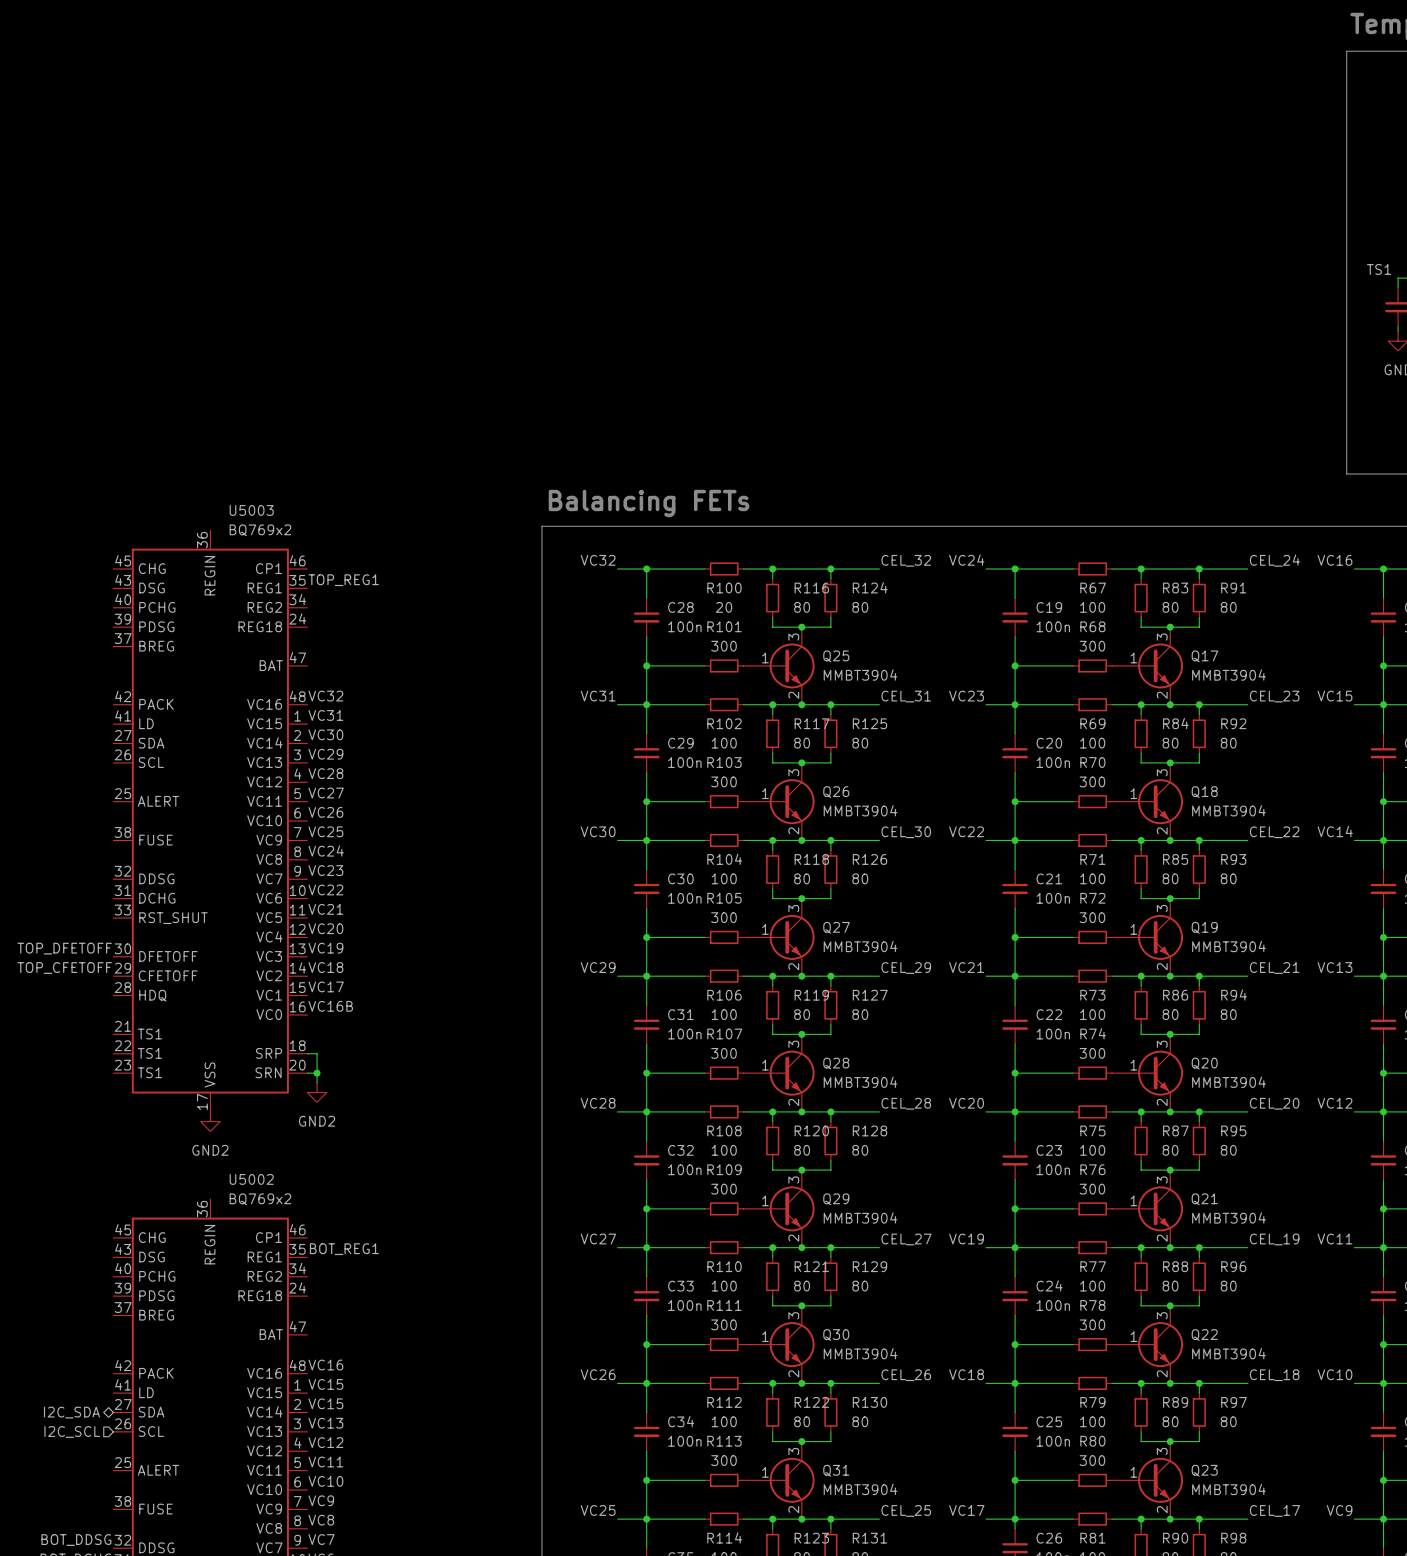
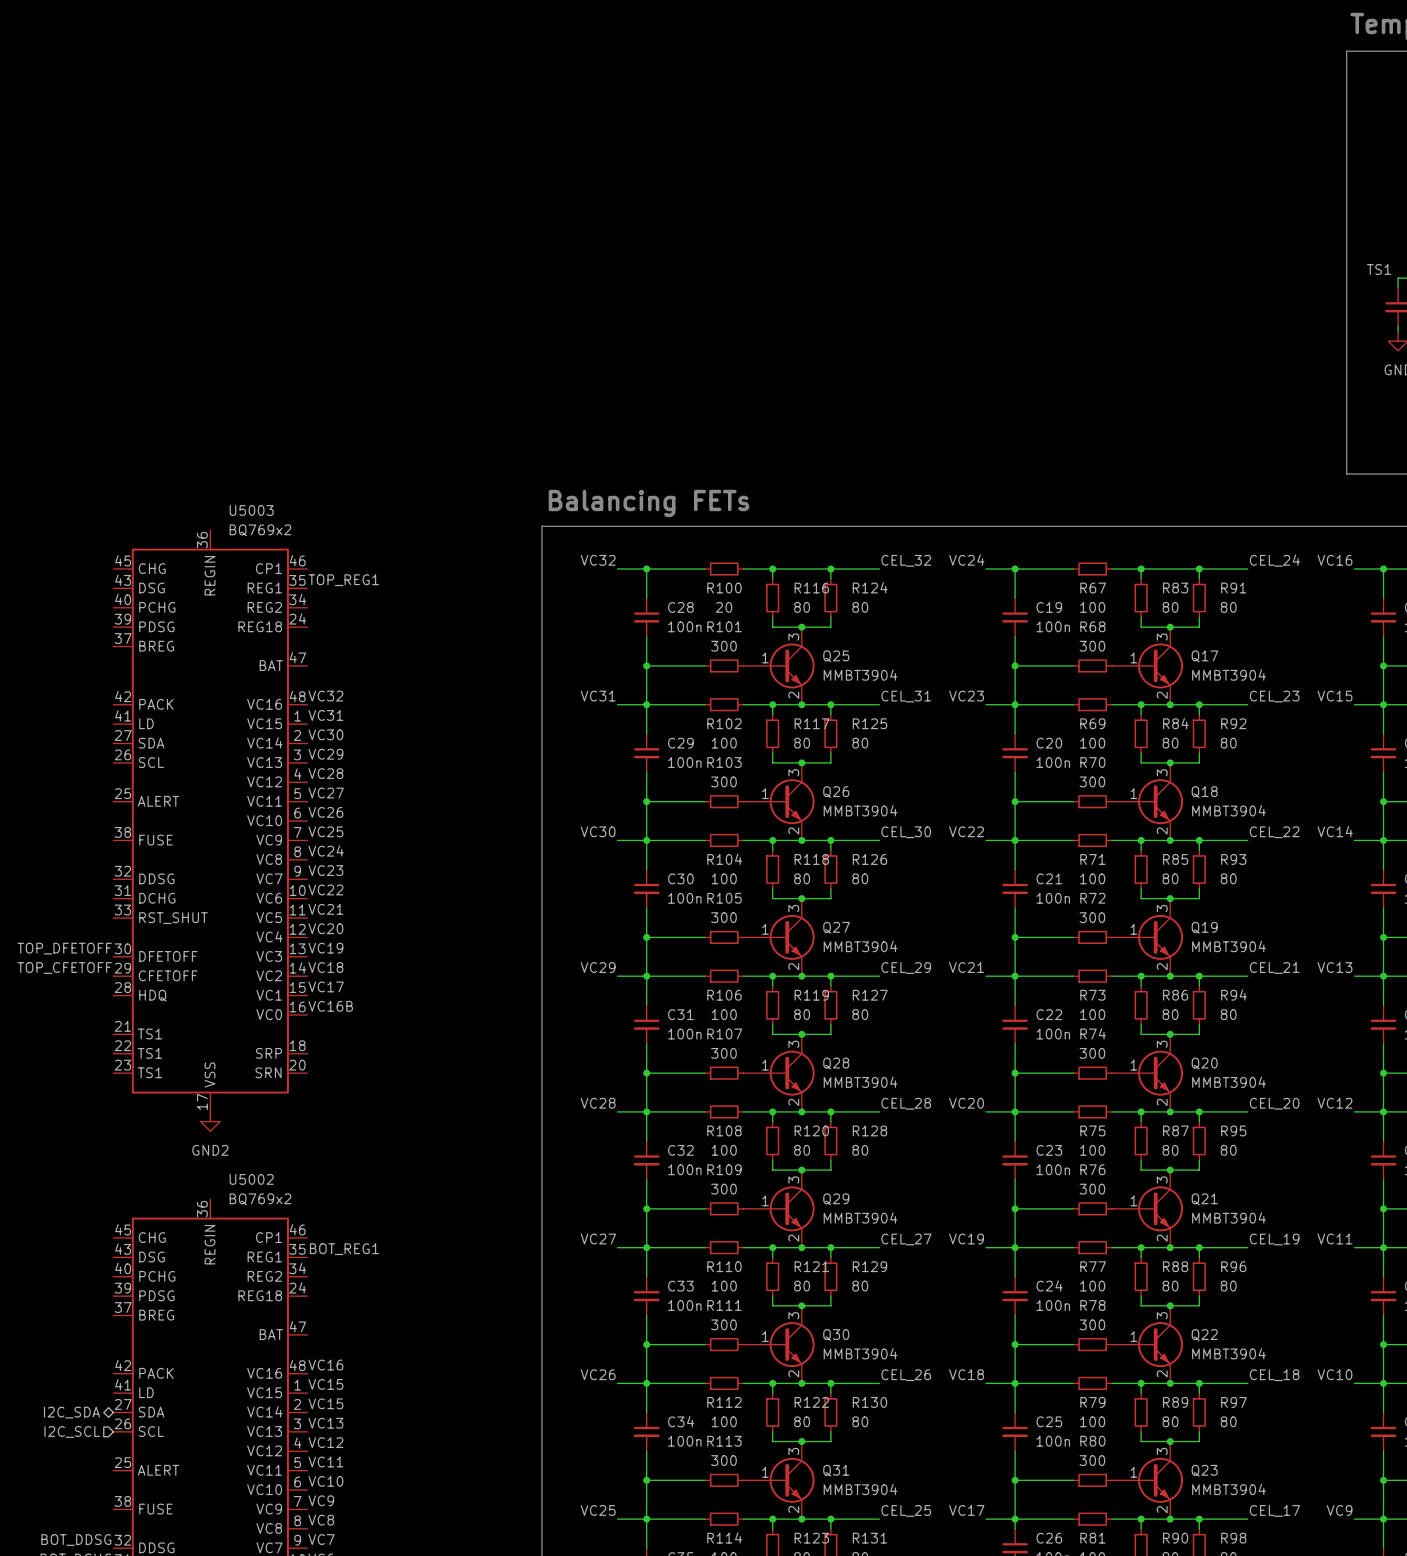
wire: (307, 1053) (317, 1053) (317, 1082) -> none
wire: (307, 1073) (317, 1073) -> none
junction: (317, 1073) -> none
power symbol: GND2 (317, 1092) -> none

